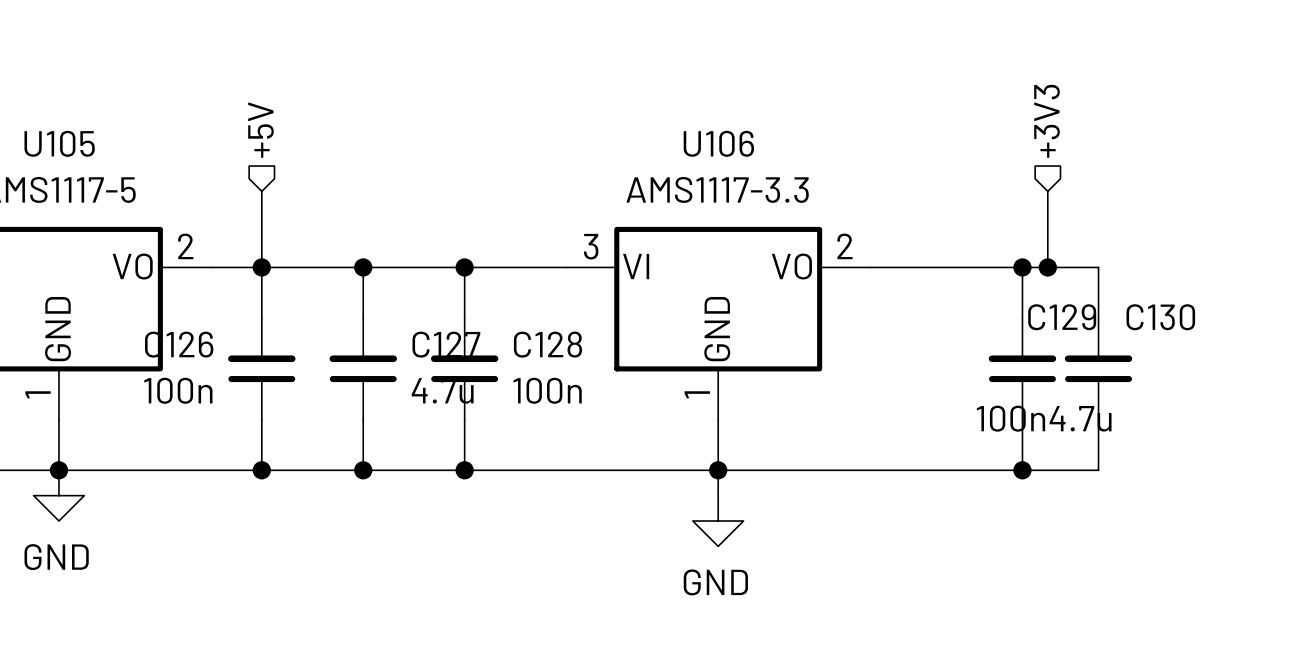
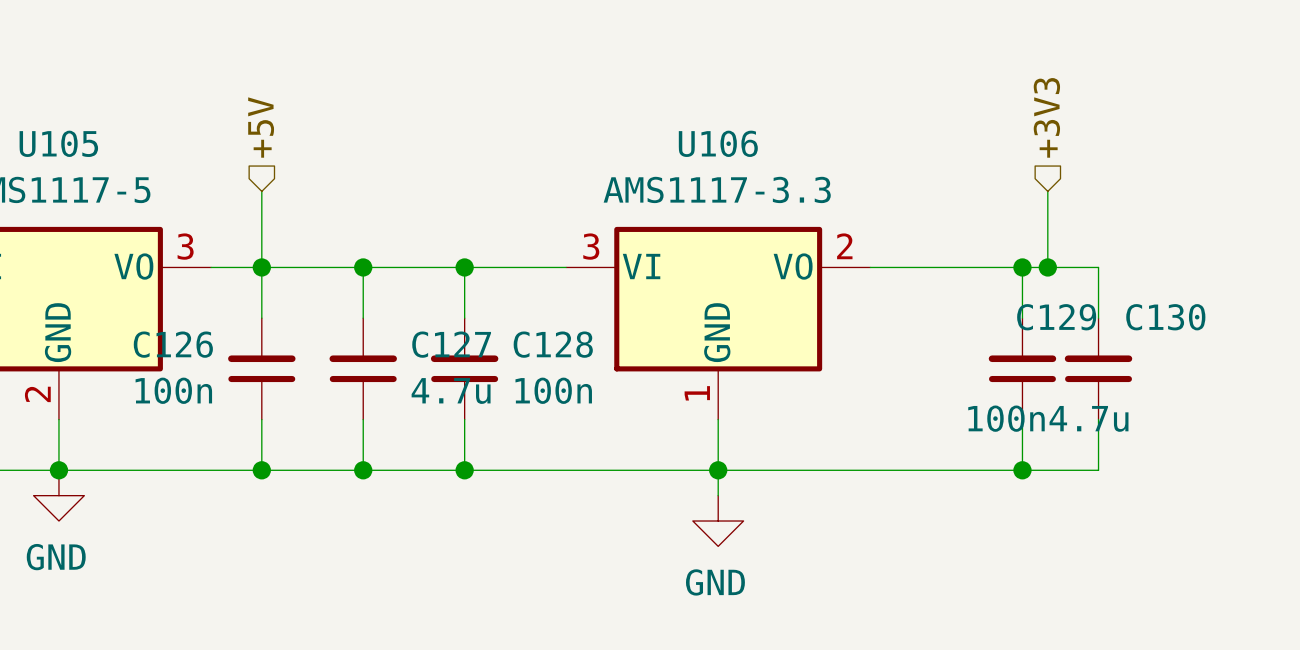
U105 pin number: 2 (185, 246) -> 3 (185, 246)
U105 pin number: 1 (38, 394) -> 2 (37, 394)

